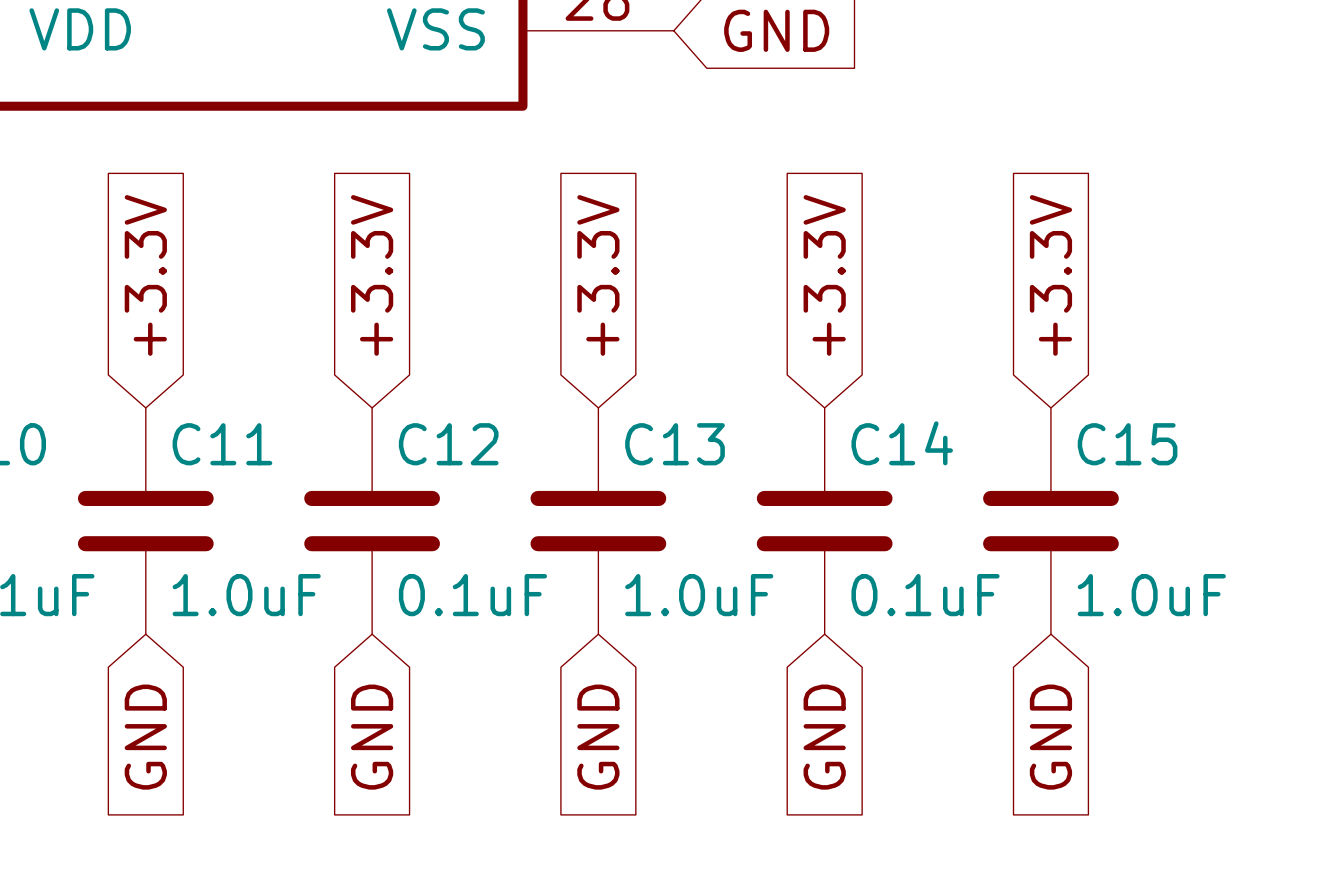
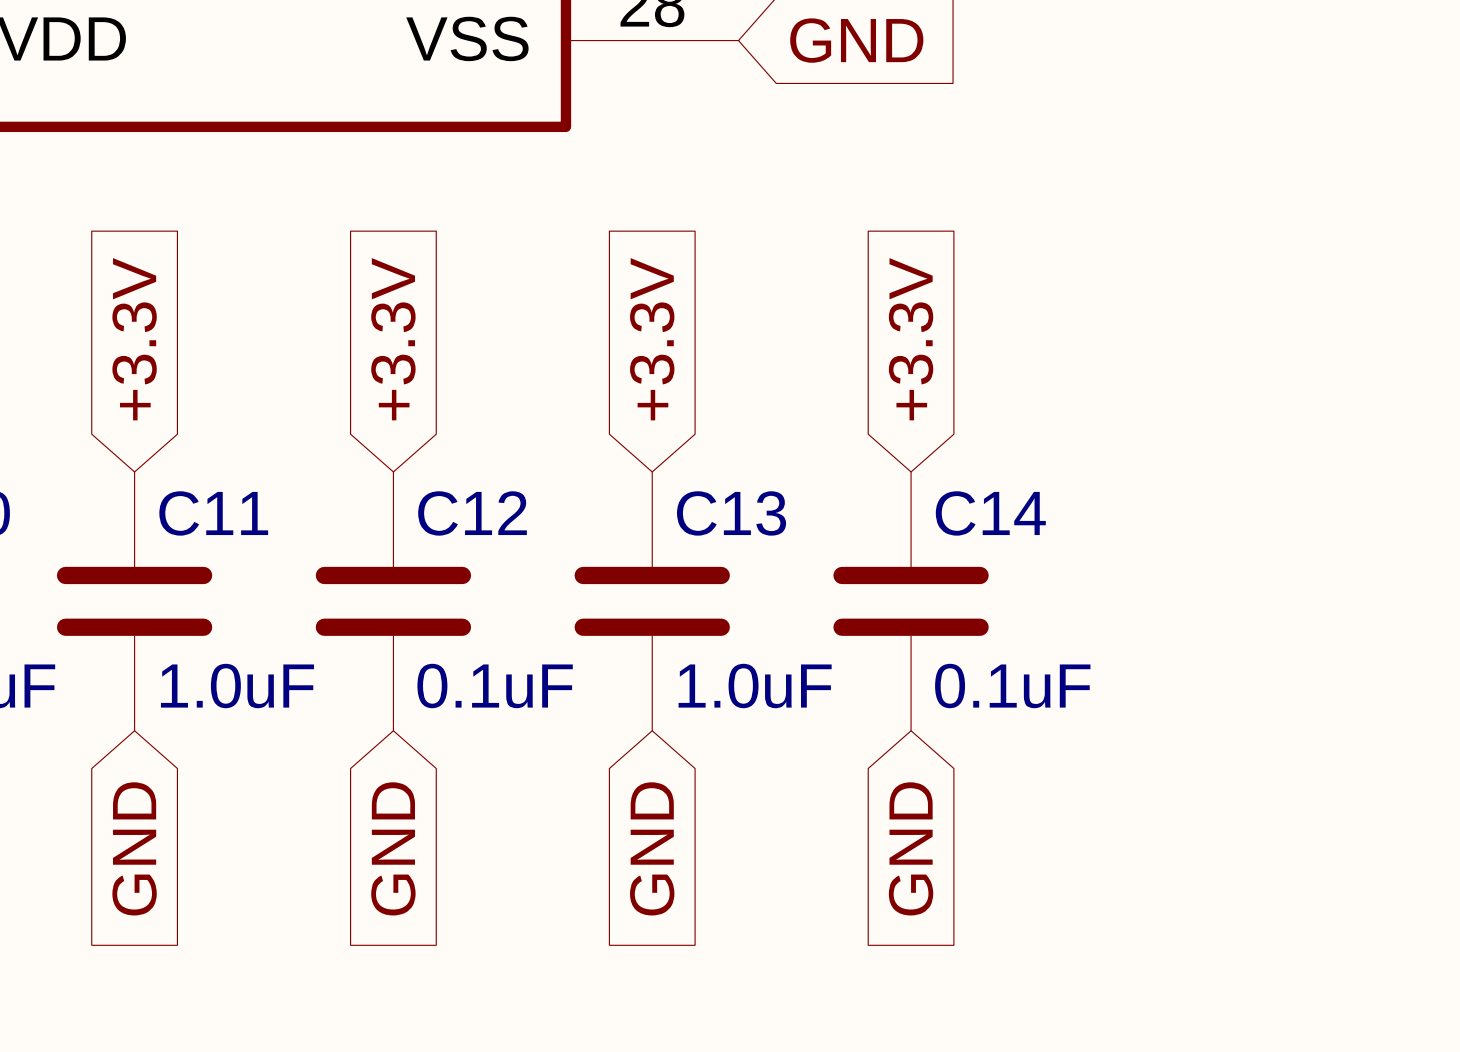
global label: +3.3V (1050, 275) -> none
C15: 1.0uF (1050, 521) -> none
global label: GND (1050, 737) -> none

